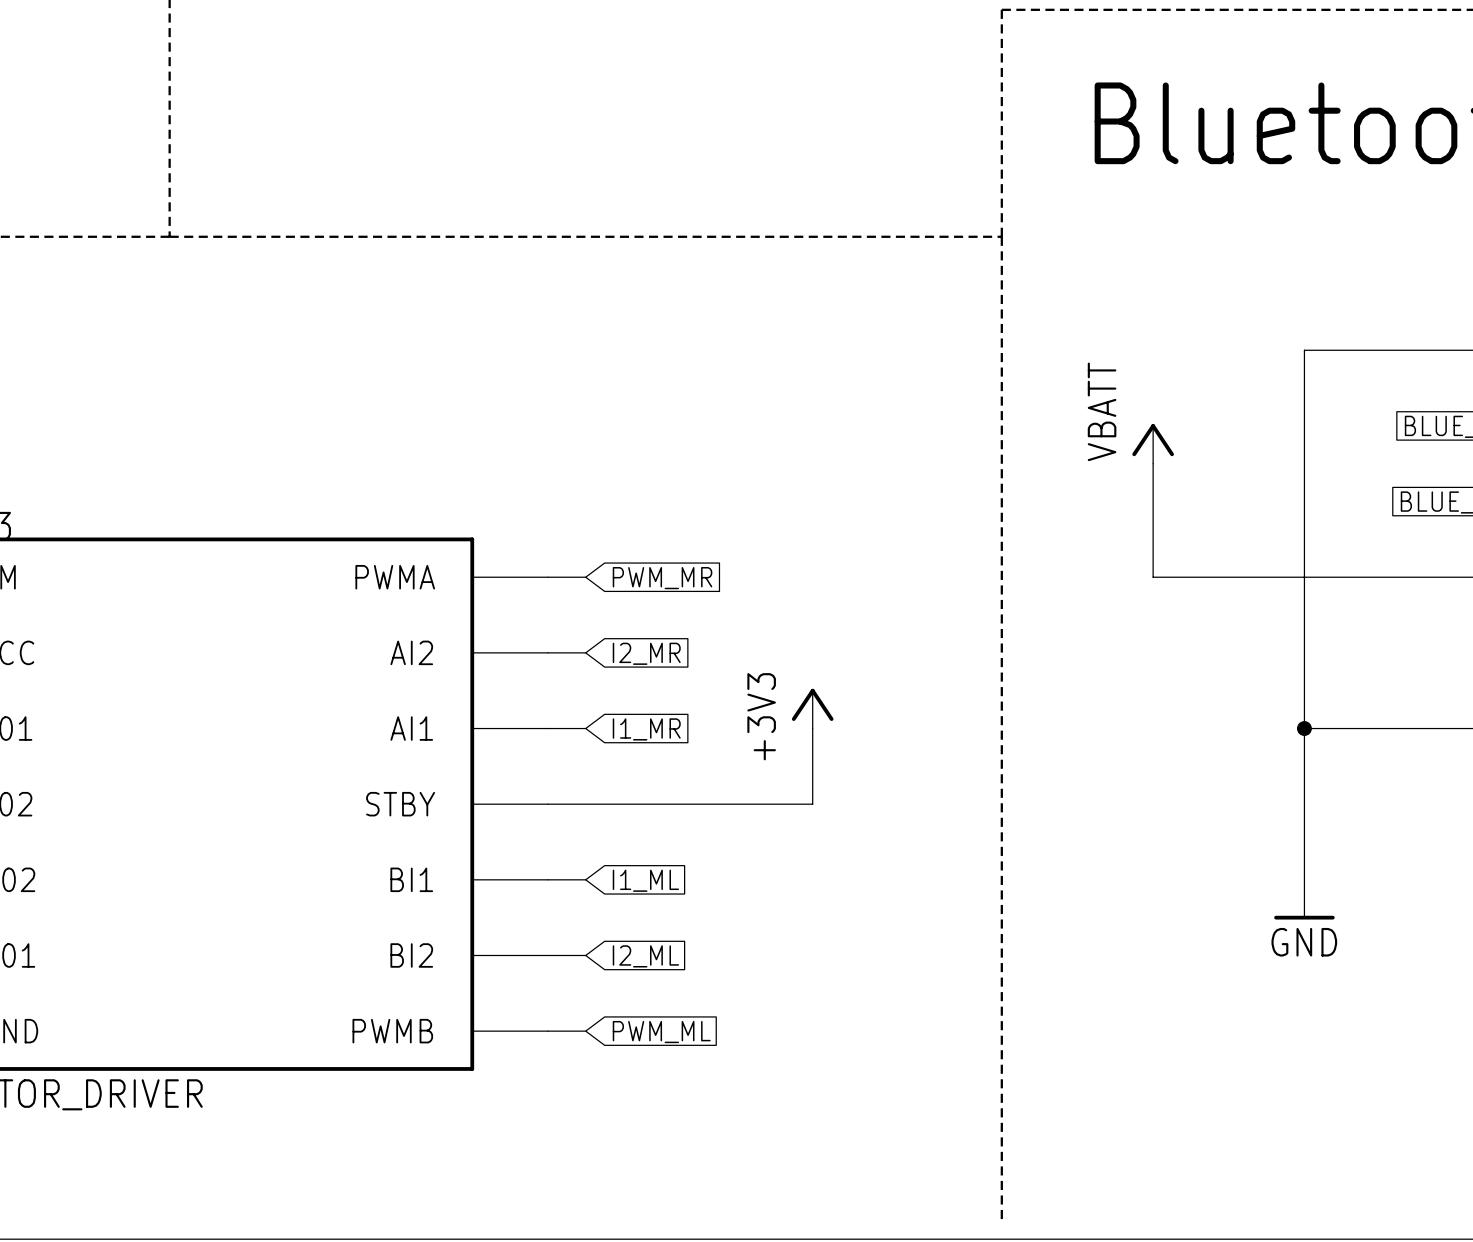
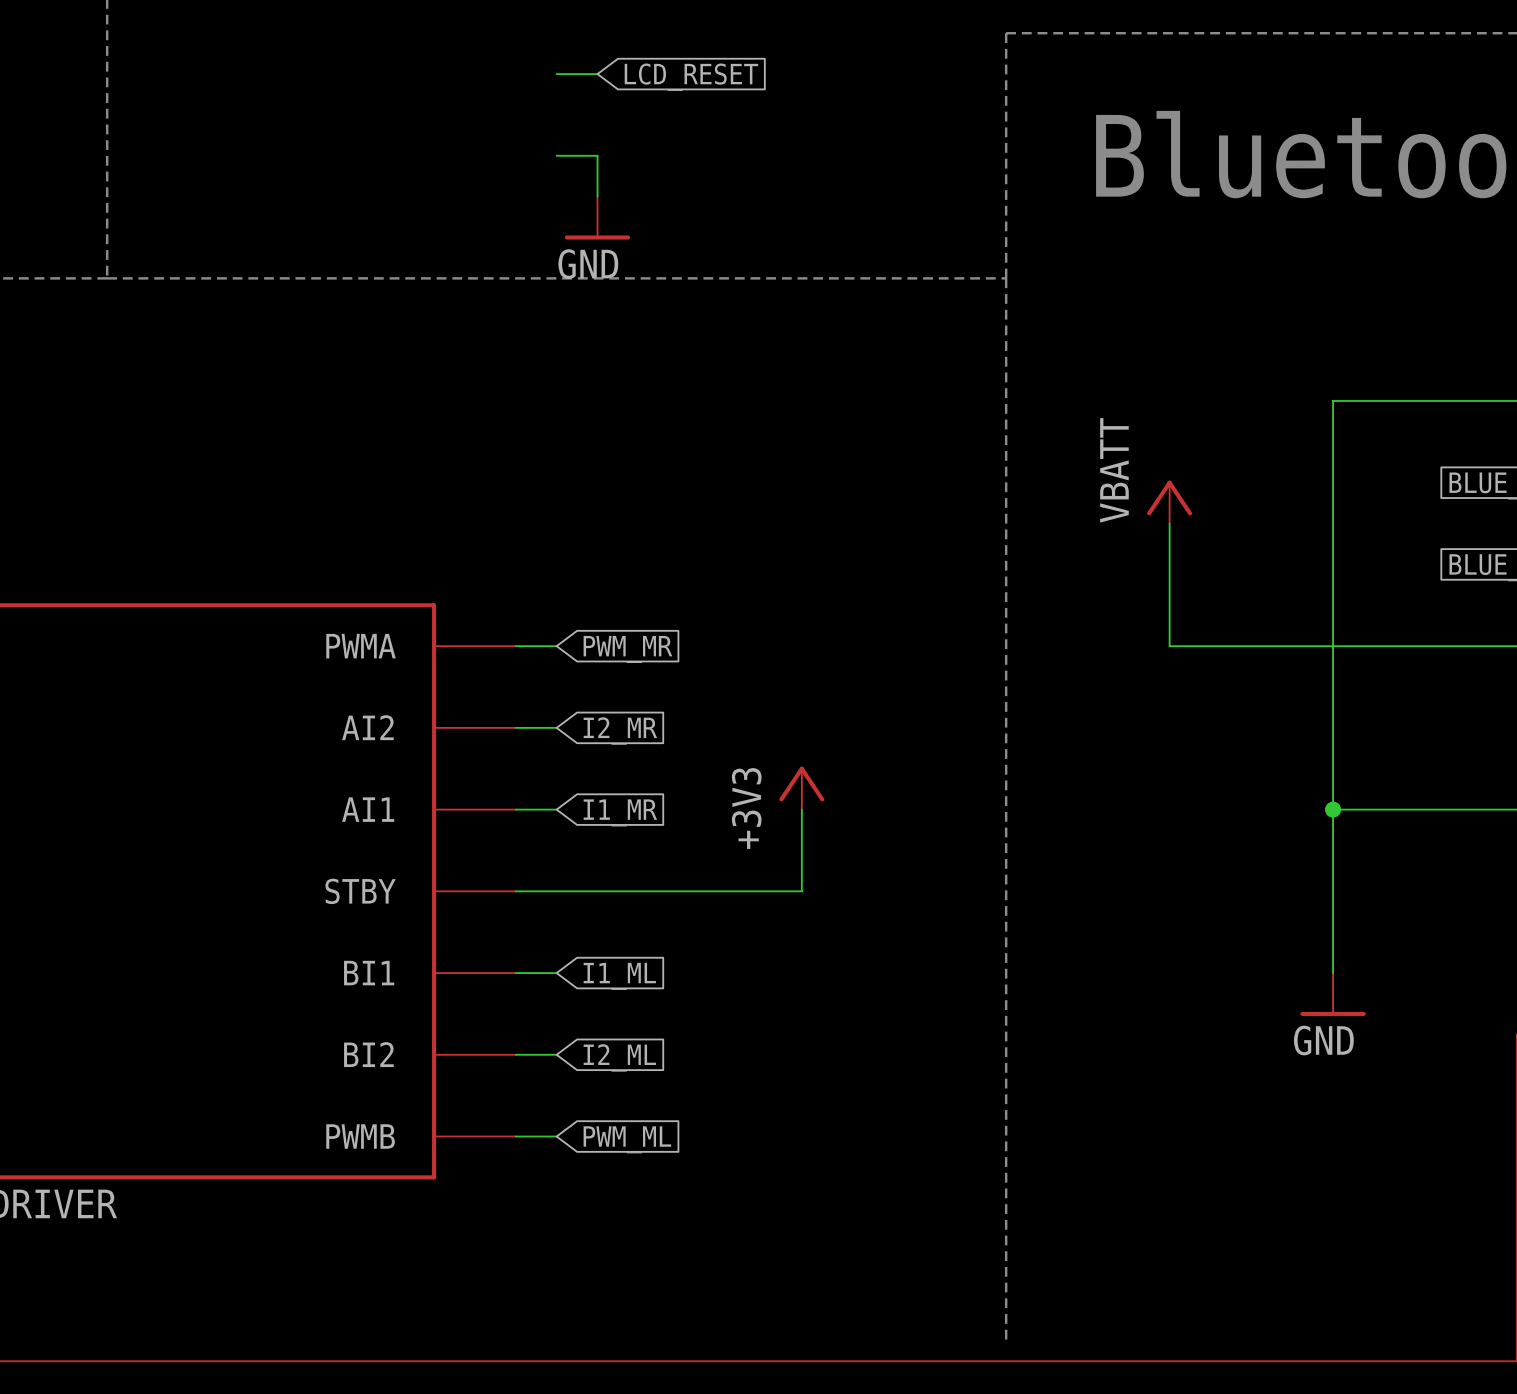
wire: none -> (556, 74) (597, 74)
global label: none -> LCD_RESET (691, 77)
wire: none -> (556, 155) (597, 155) (597, 196)
power symbol: none -> GND (597, 218)

